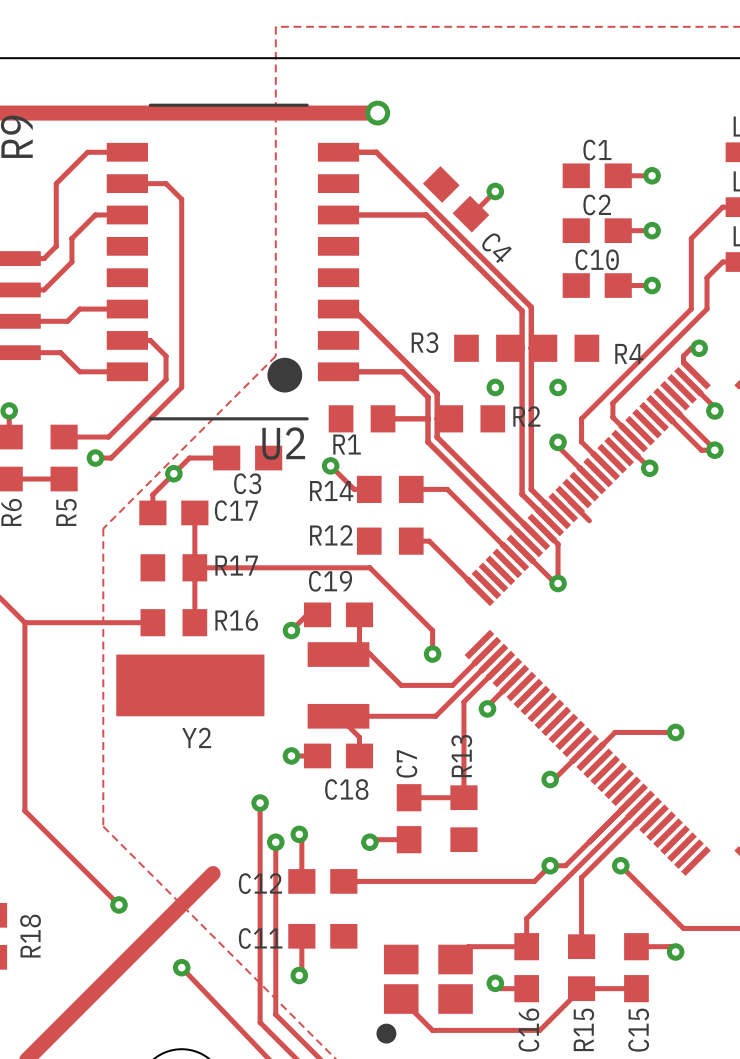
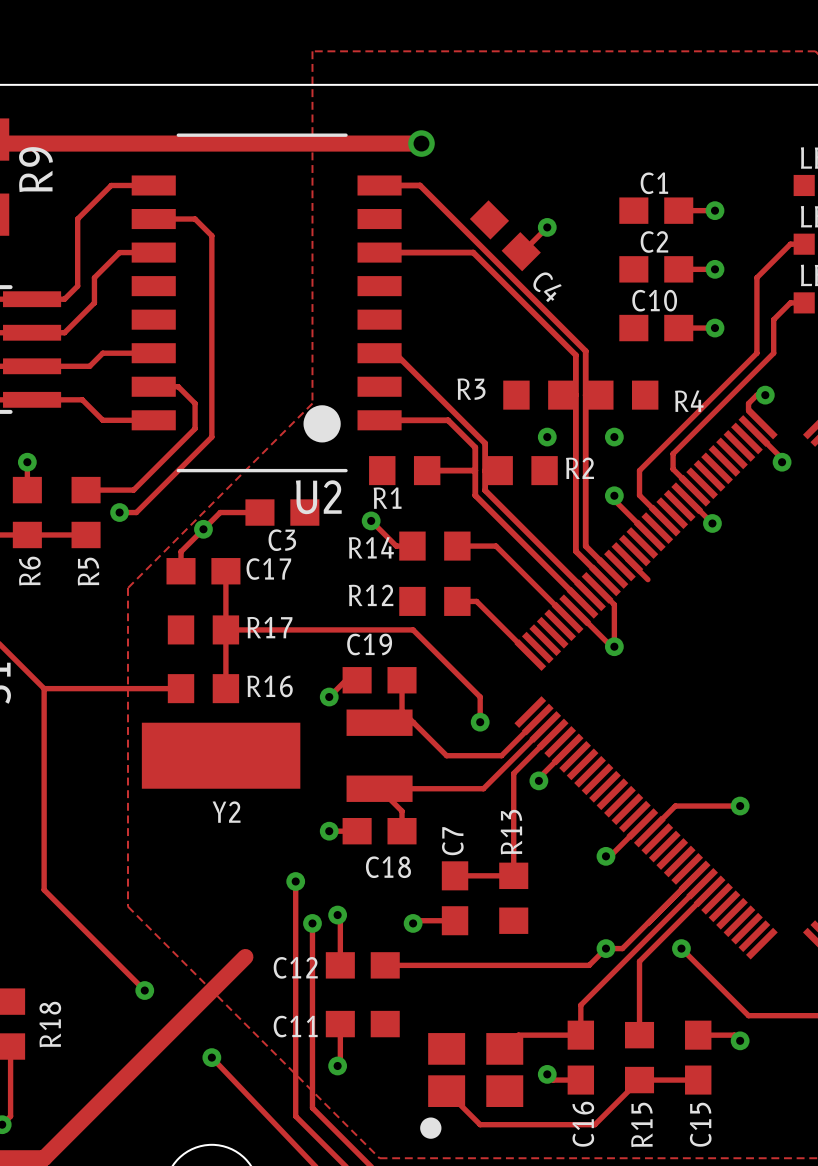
track: (668, 403) (714, 450) (701, 450) (661, 409) -> none
via: (714, 450) -> none

